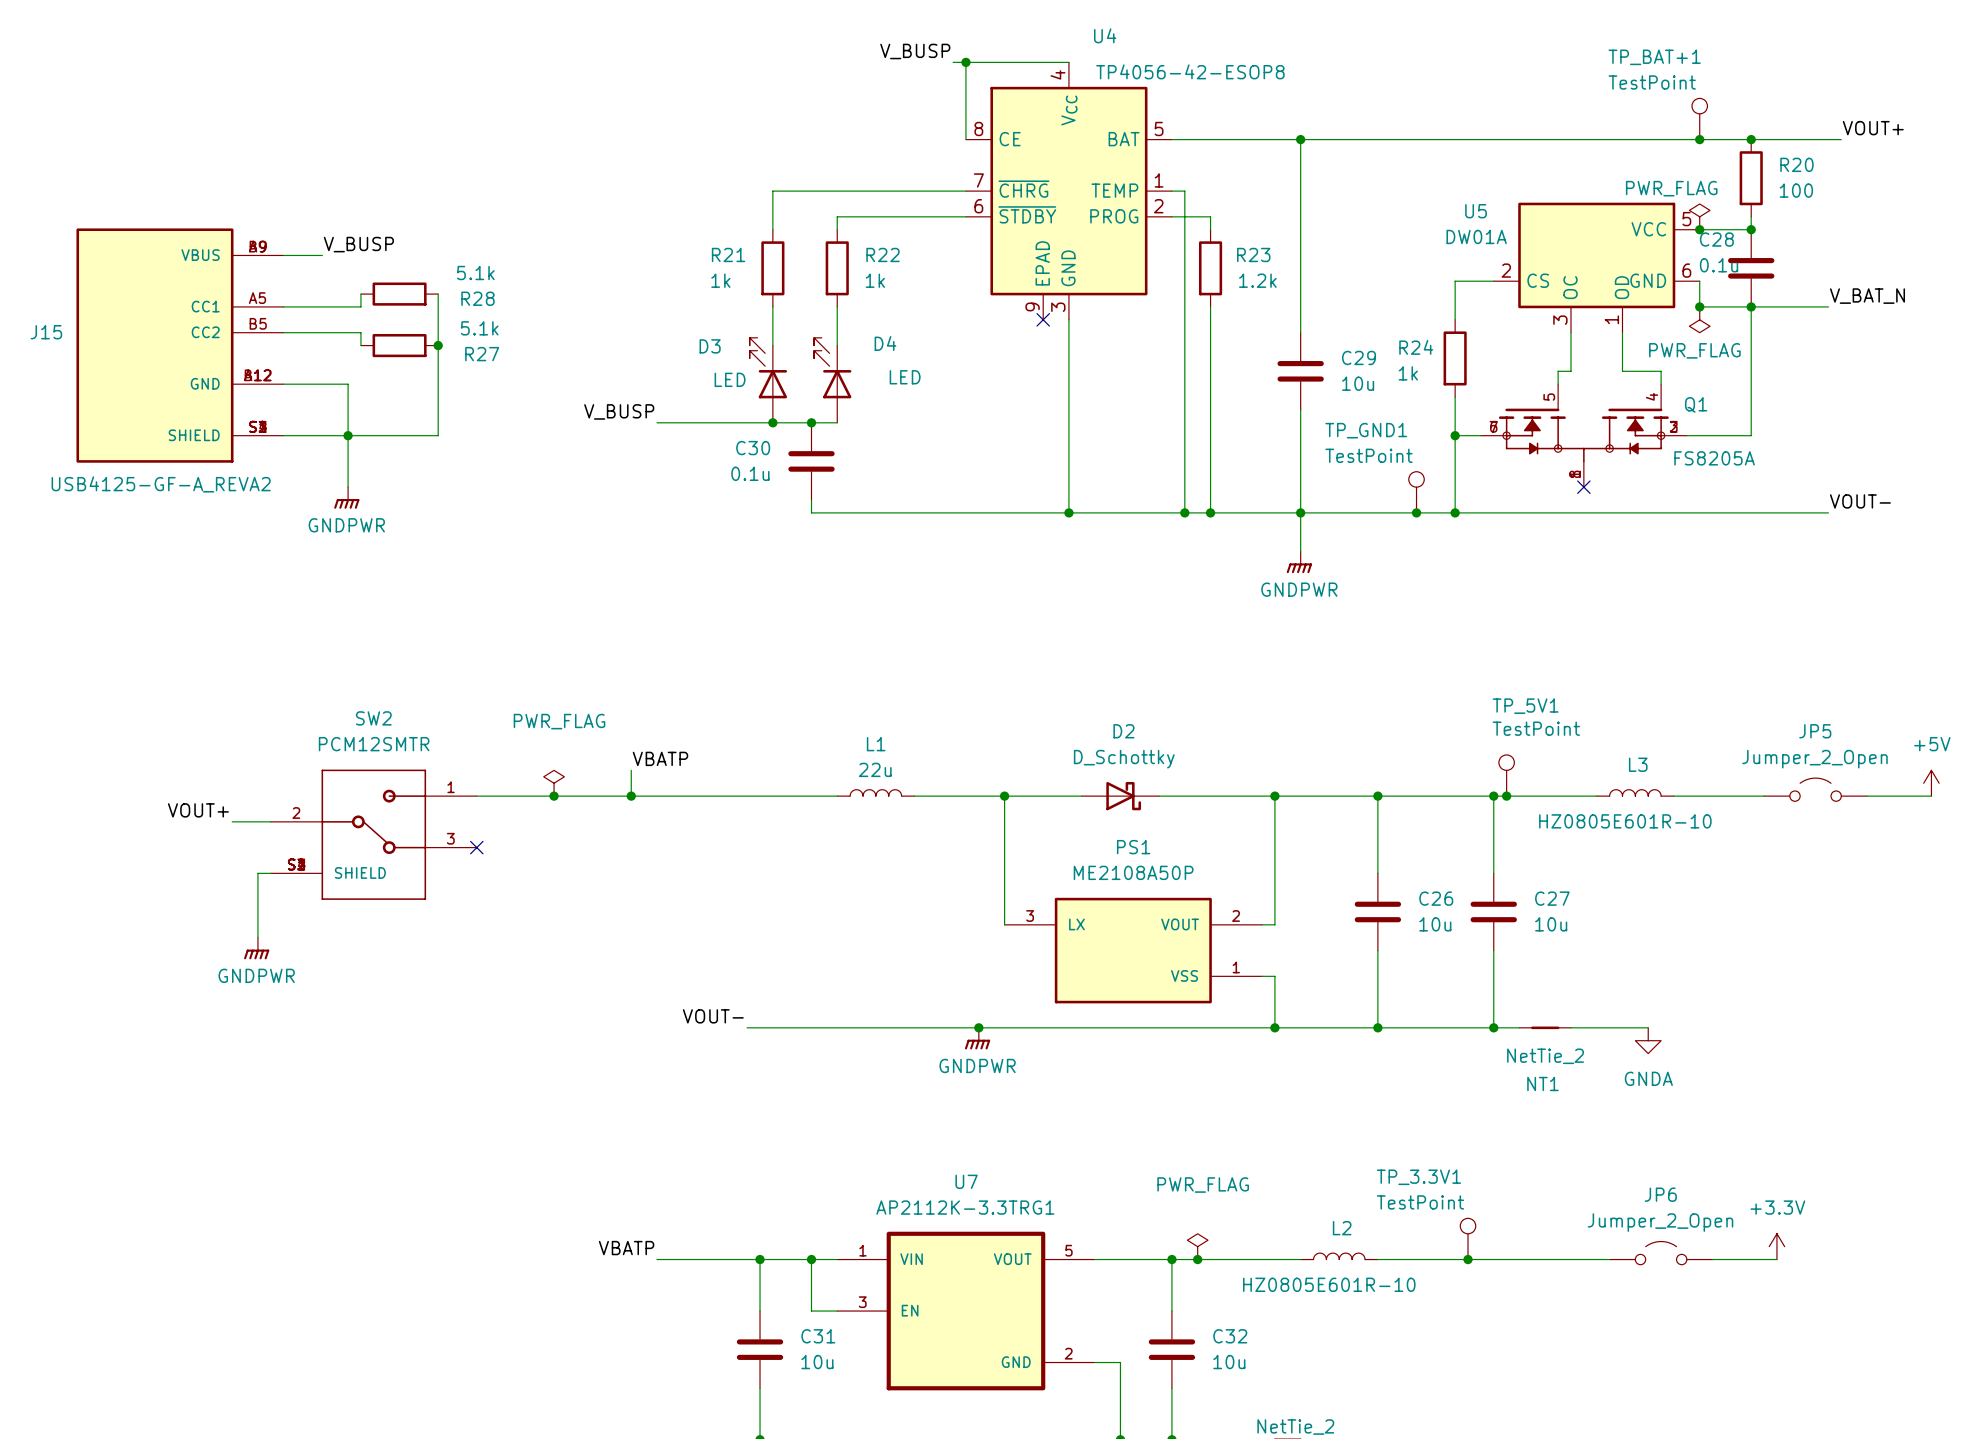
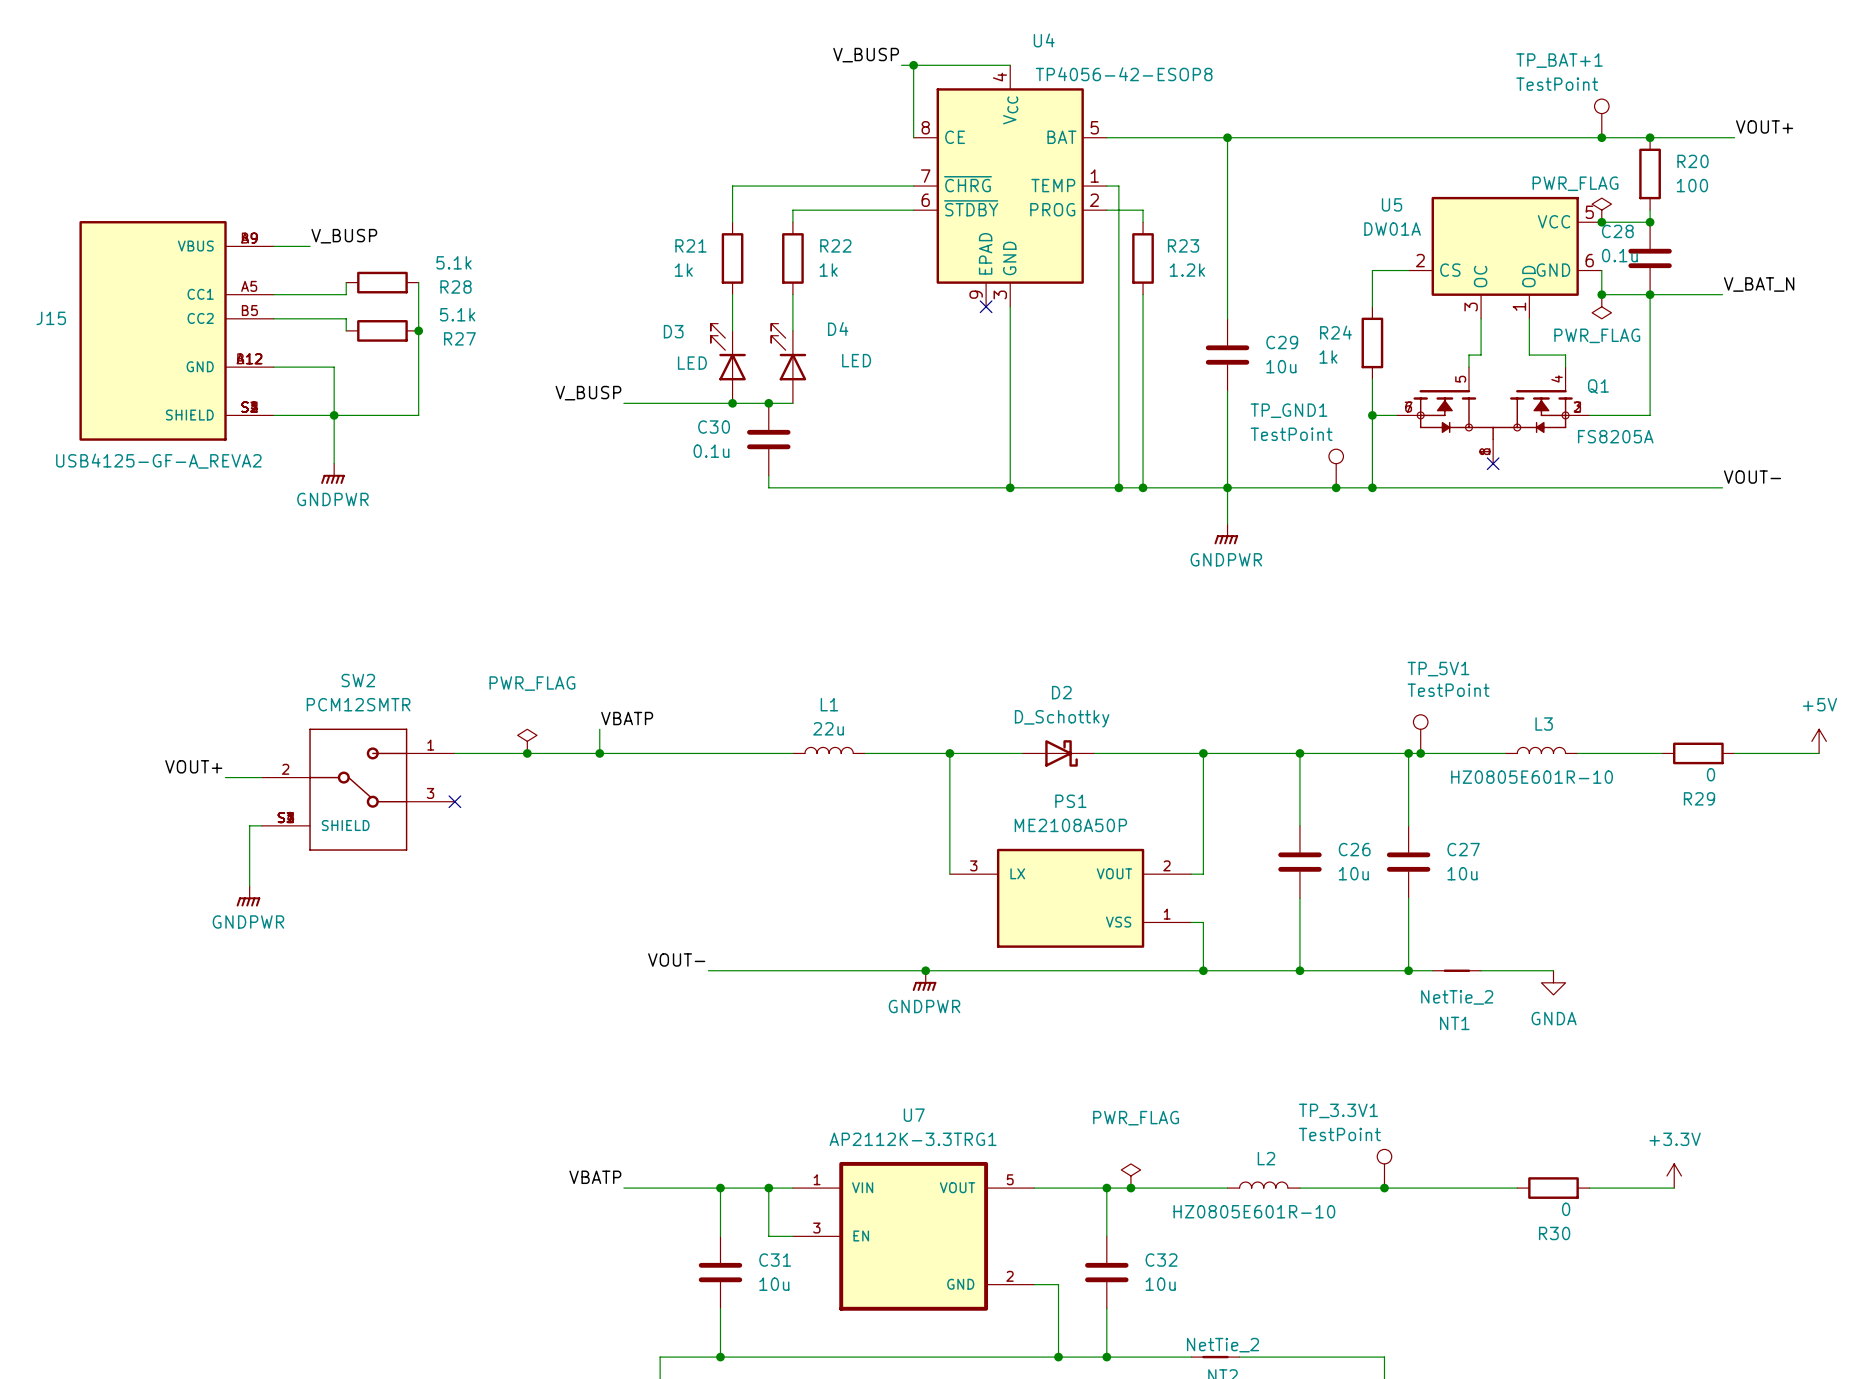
JP5: Jumper_2_Open (1815, 789) -> none
R29: none -> 0 (1698, 753)
JP6: Jumper_2_Open (1661, 1253) -> none
R30: none -> 0 (1553, 1188)

